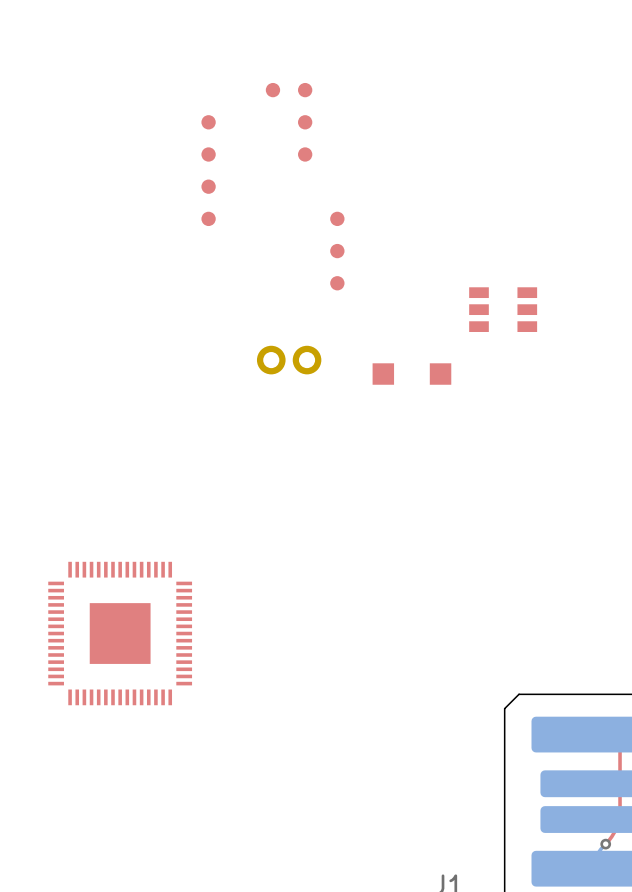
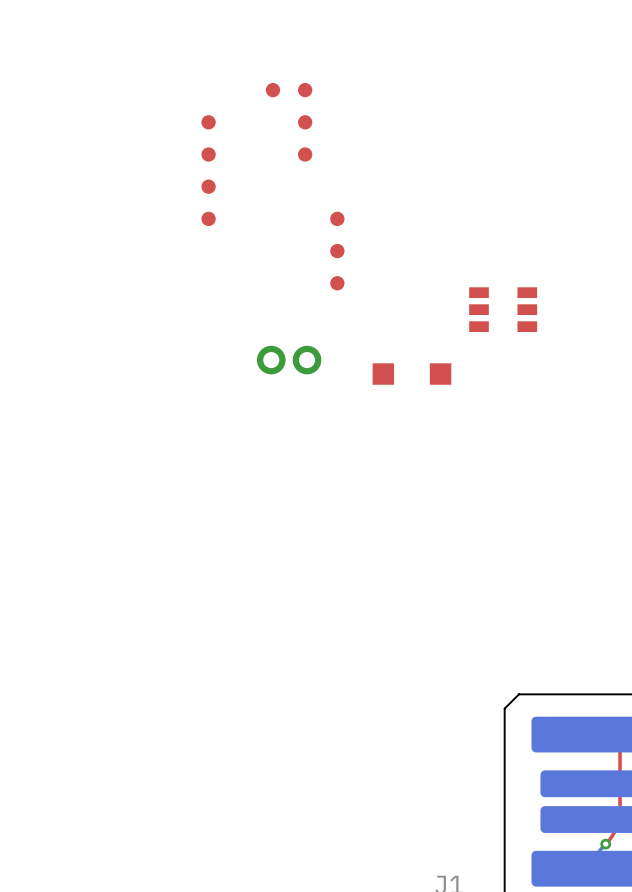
part: (120, 633) -> none

